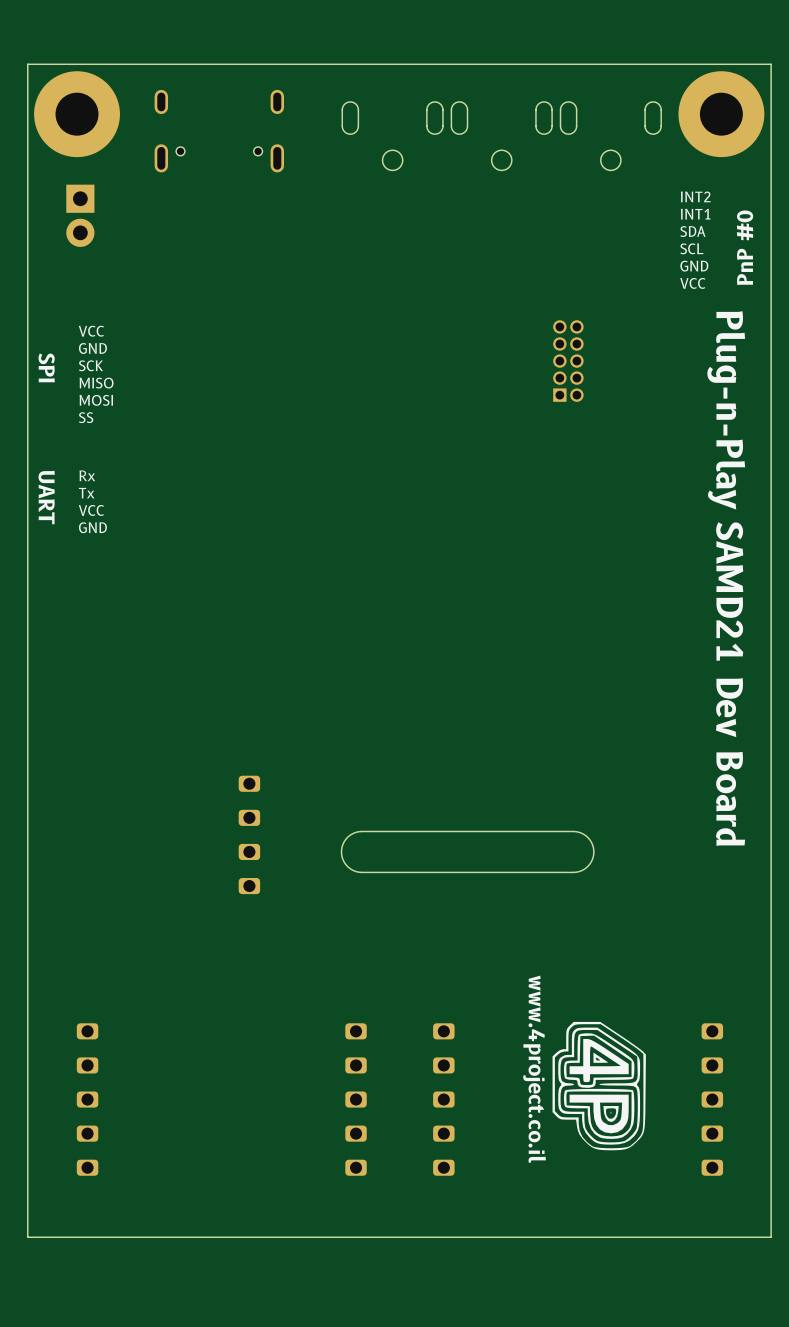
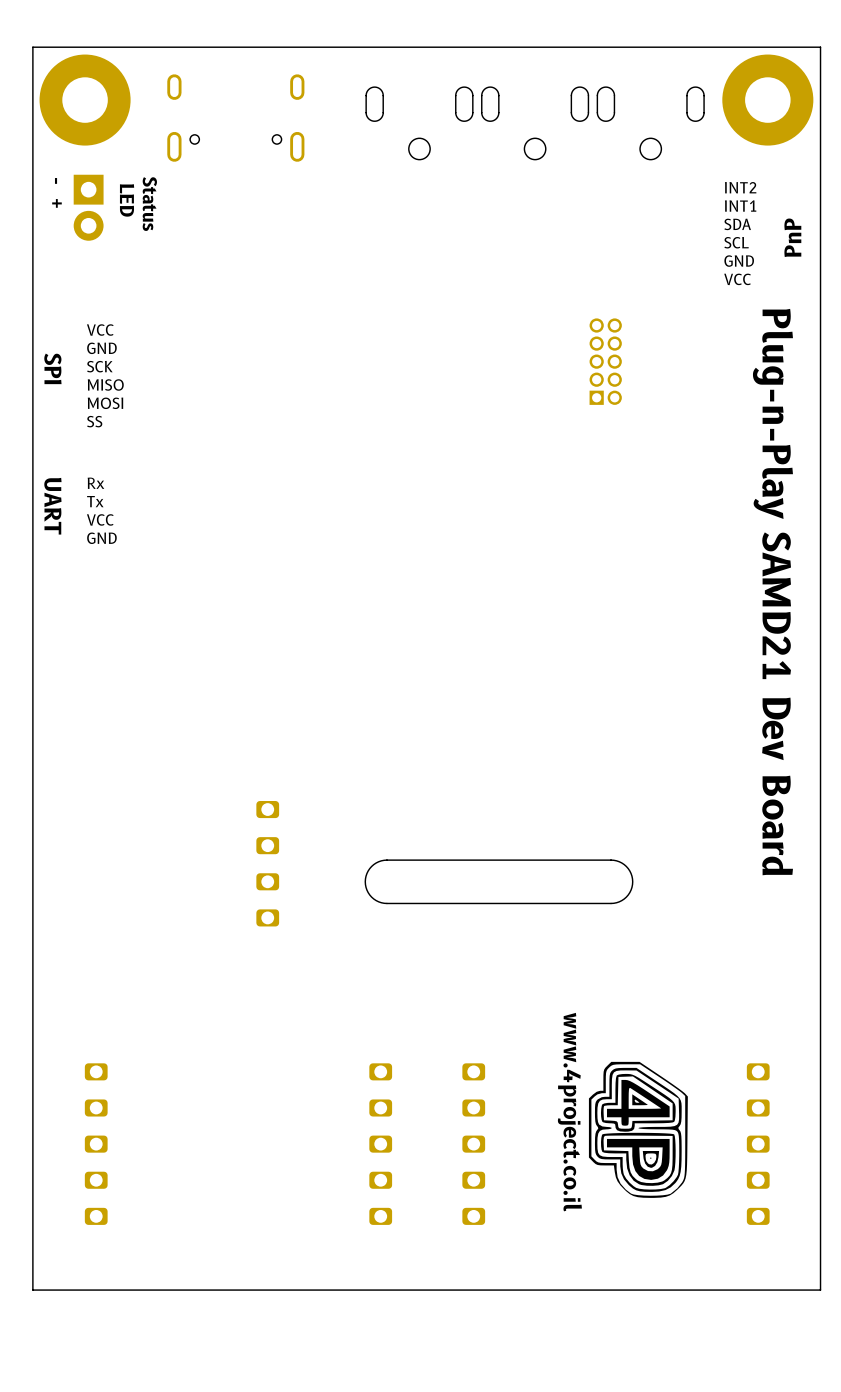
text: none -> - + (56, 192)
text: none -> LED (127, 200)
text: none -> Status (149, 204)
text: PnP #0 (745, 247) -> PnP (792, 237)

